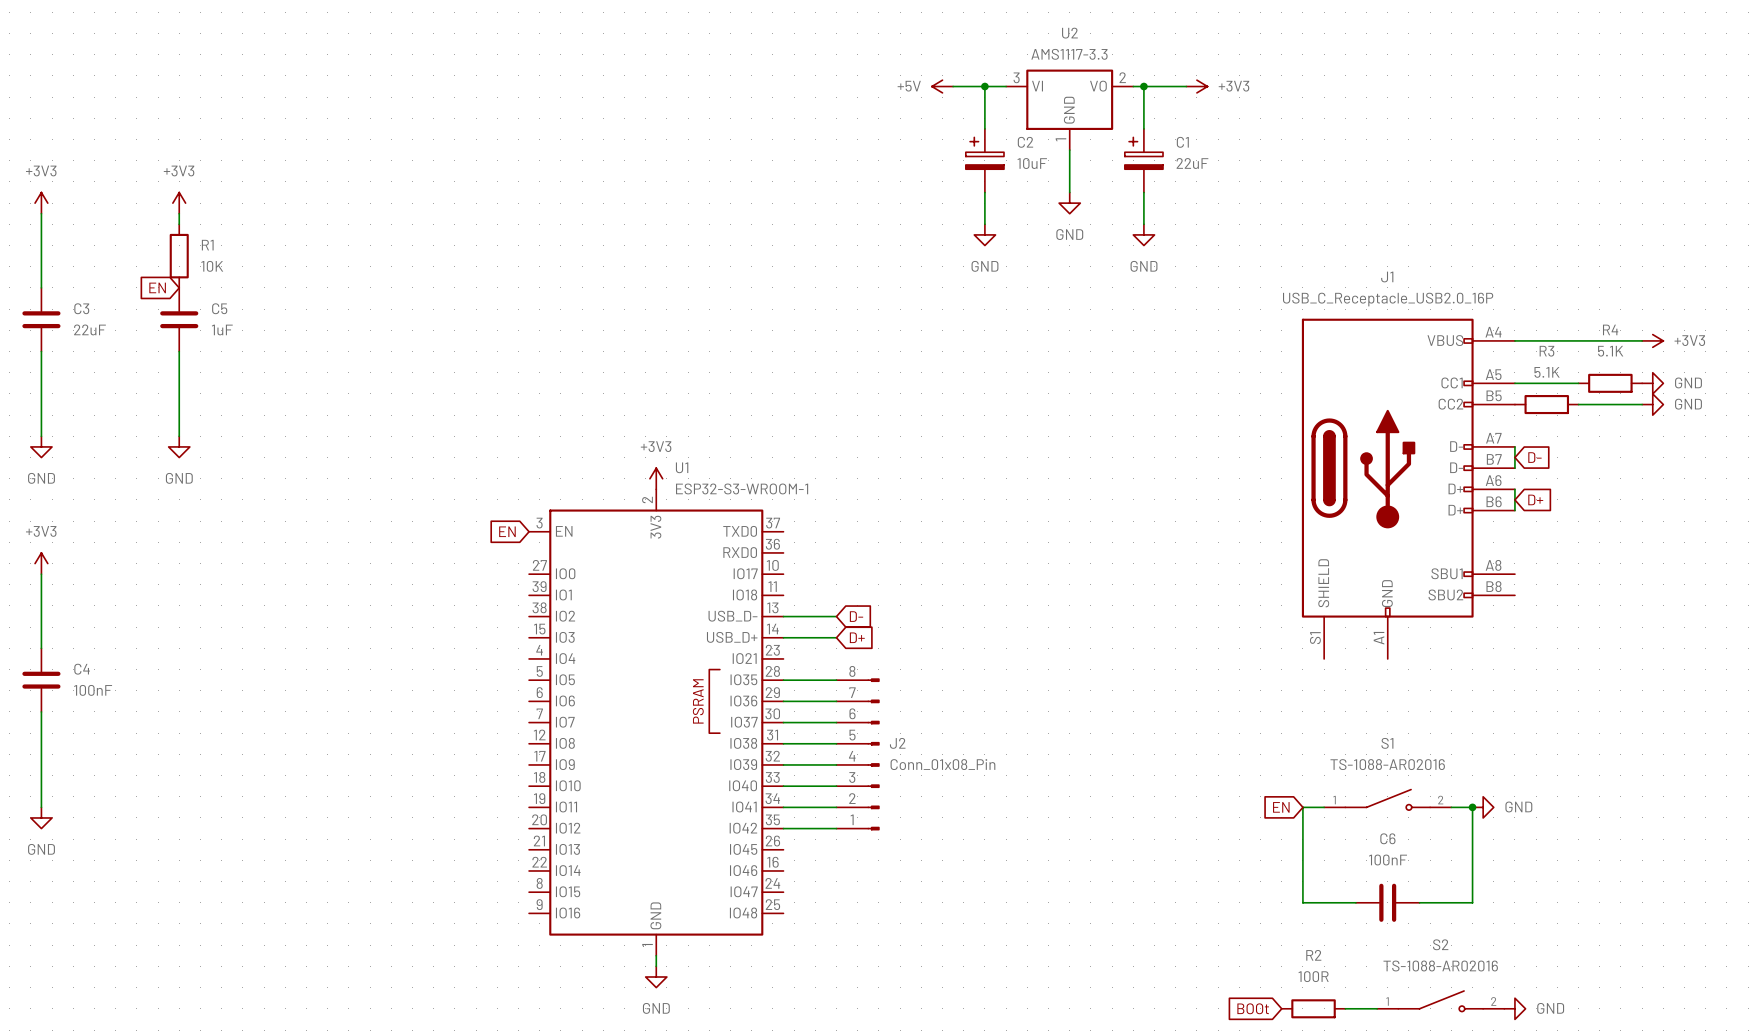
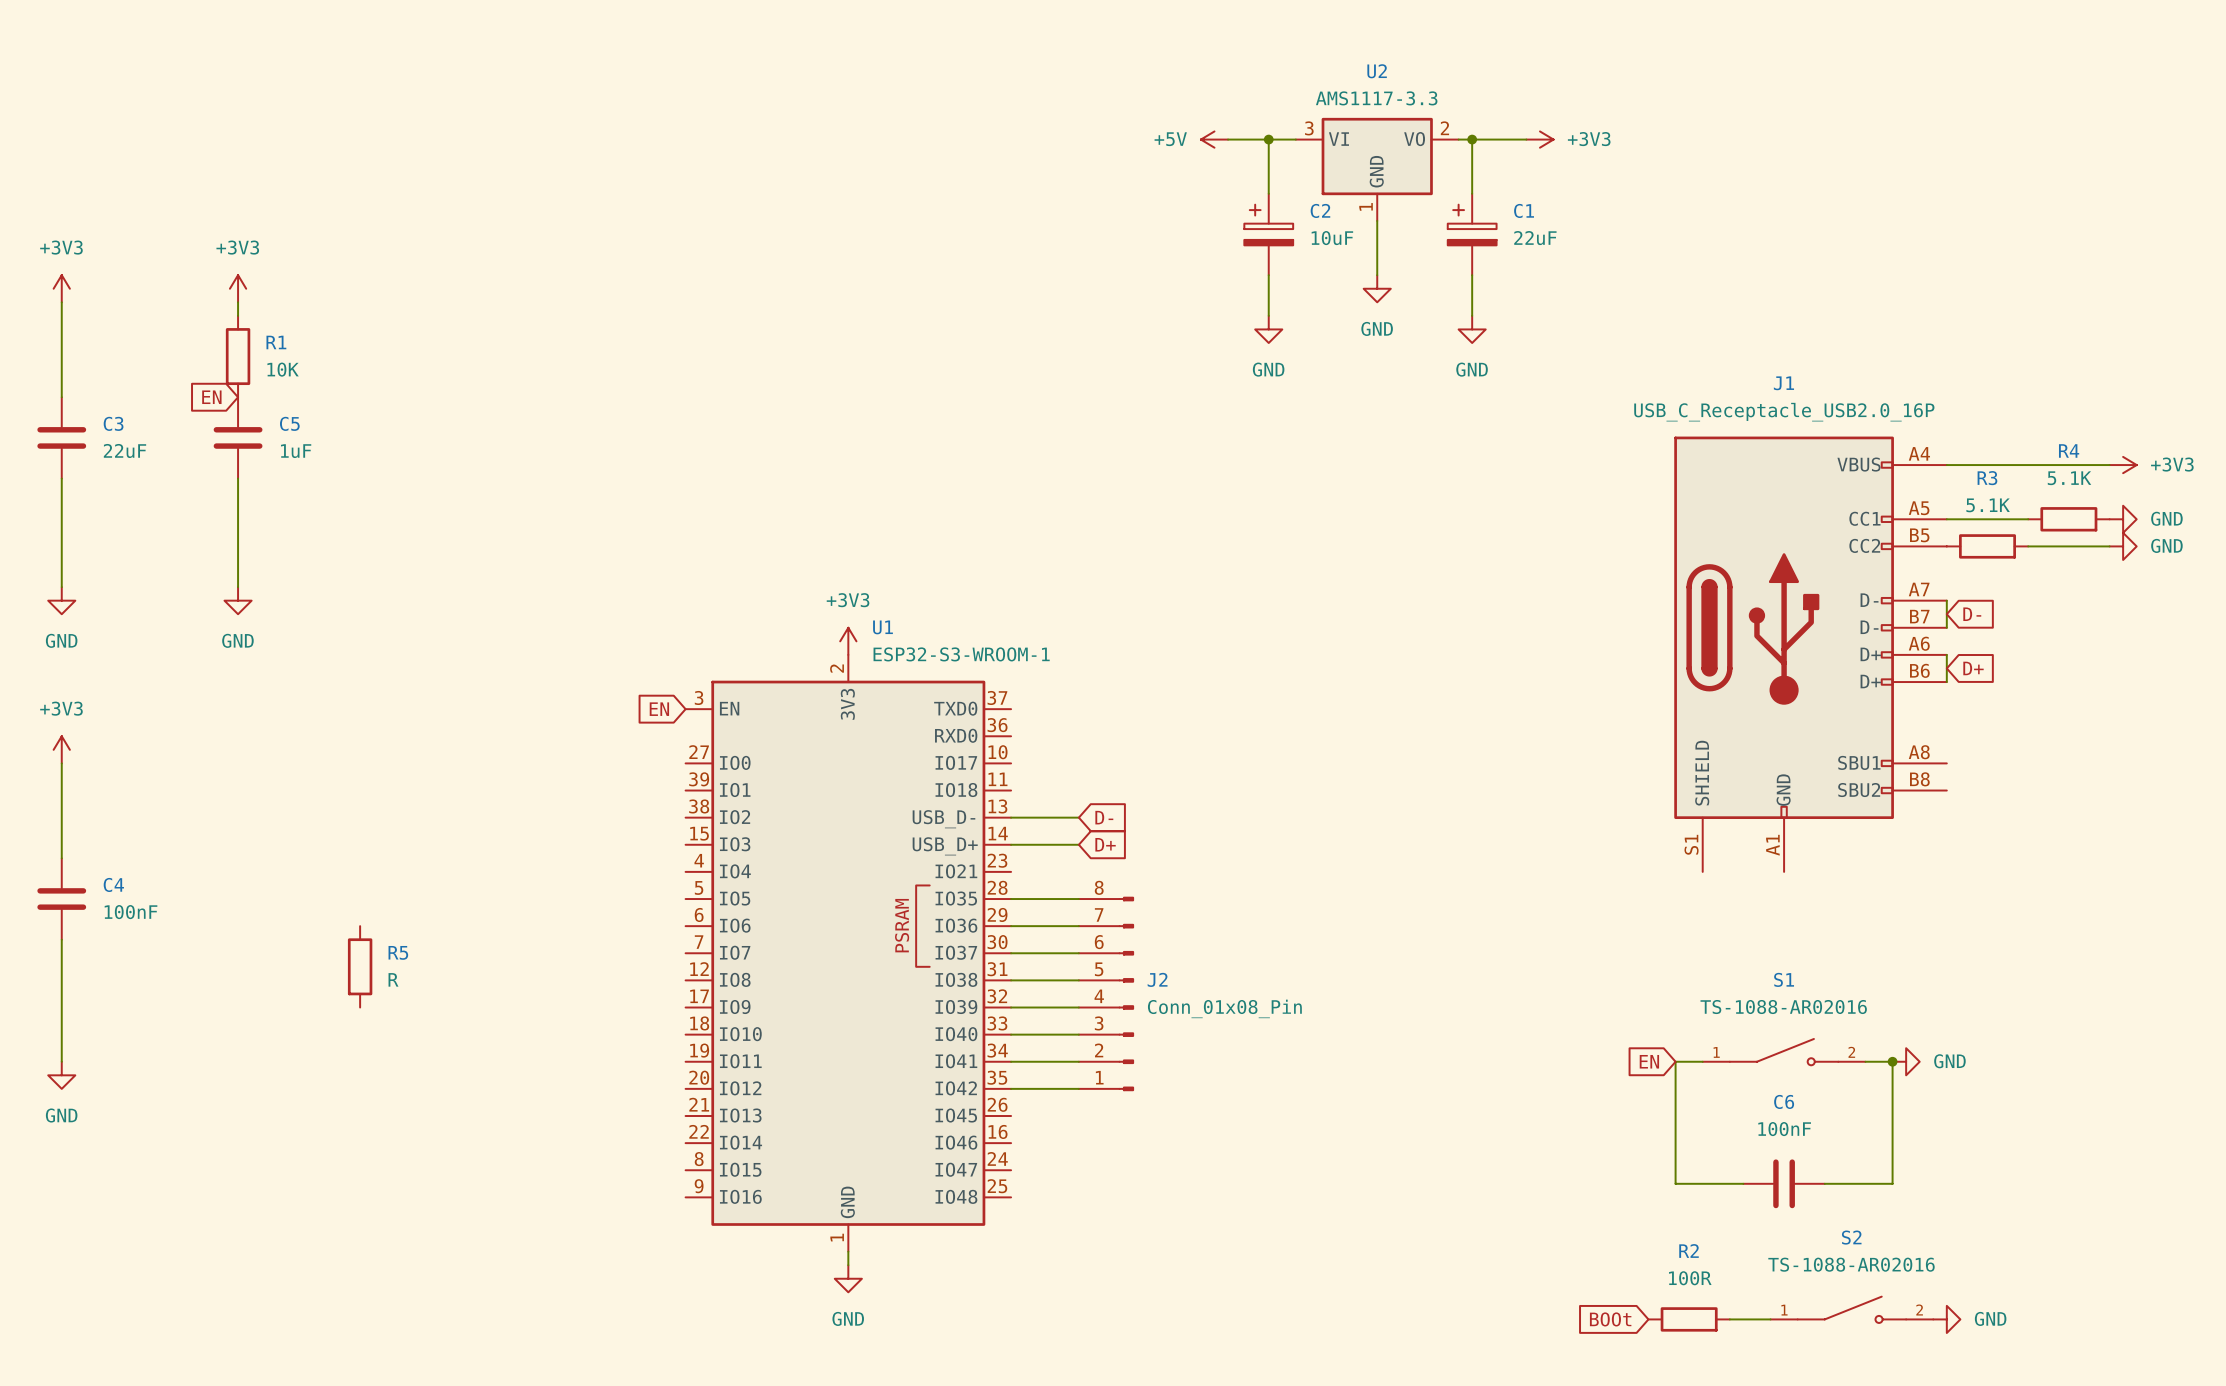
R5: none -> R (360, 966)

